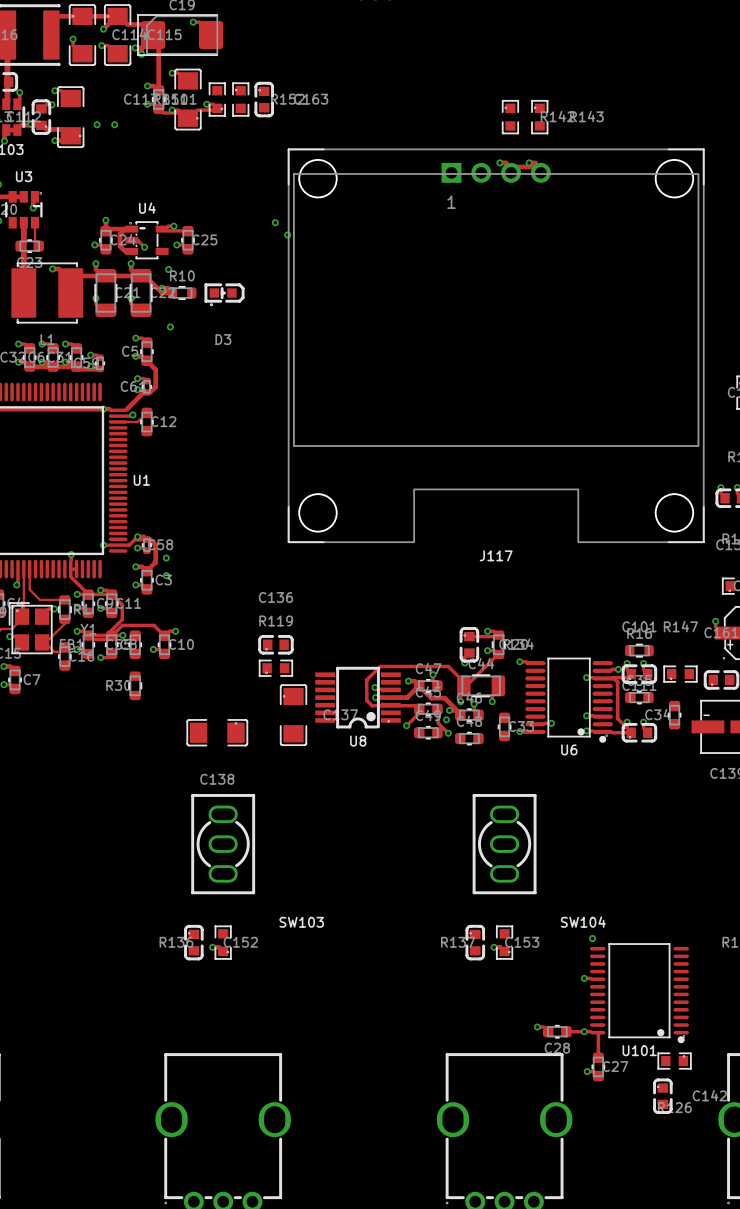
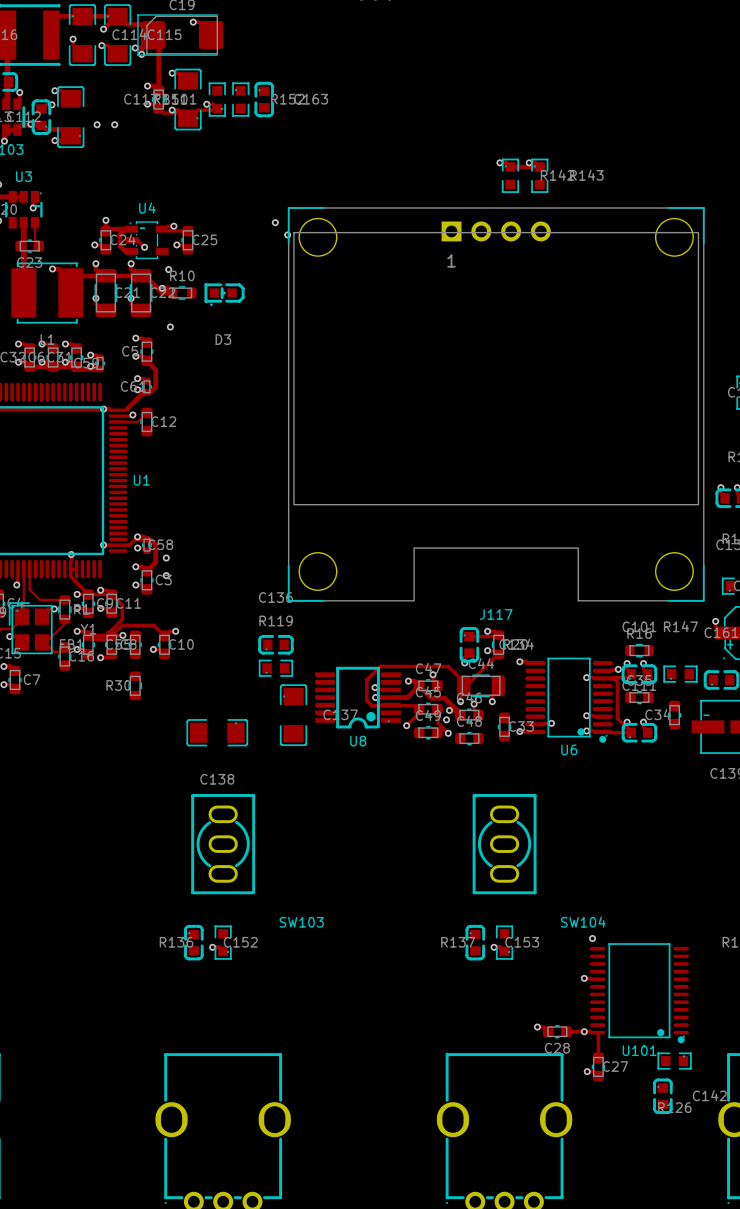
R142 position: (510, 117) -> (510, 175)
R143 position: (539, 117) -> (539, 175)
J117 position: (496, 345) -> (496, 404)

